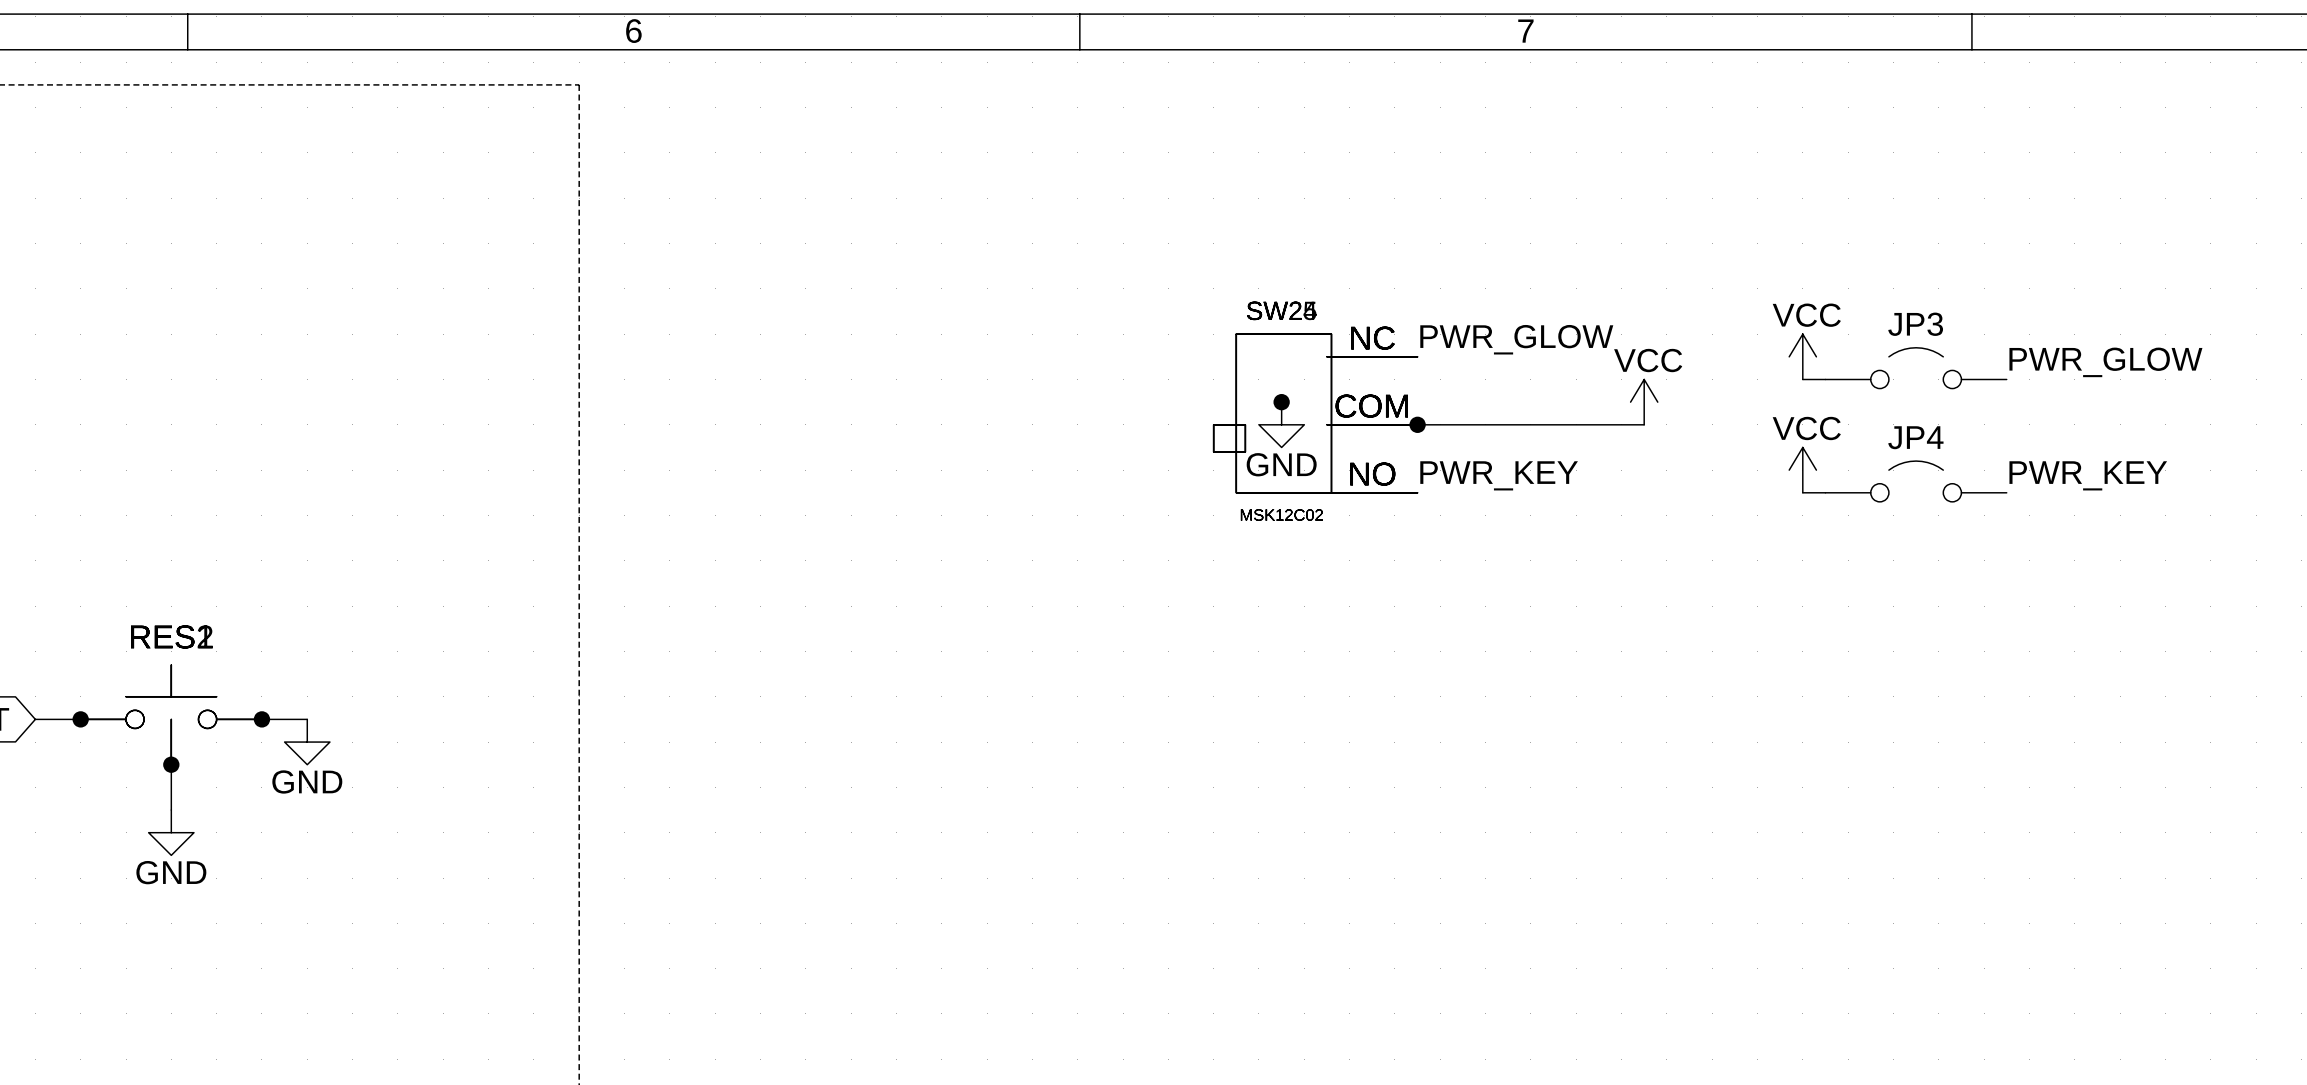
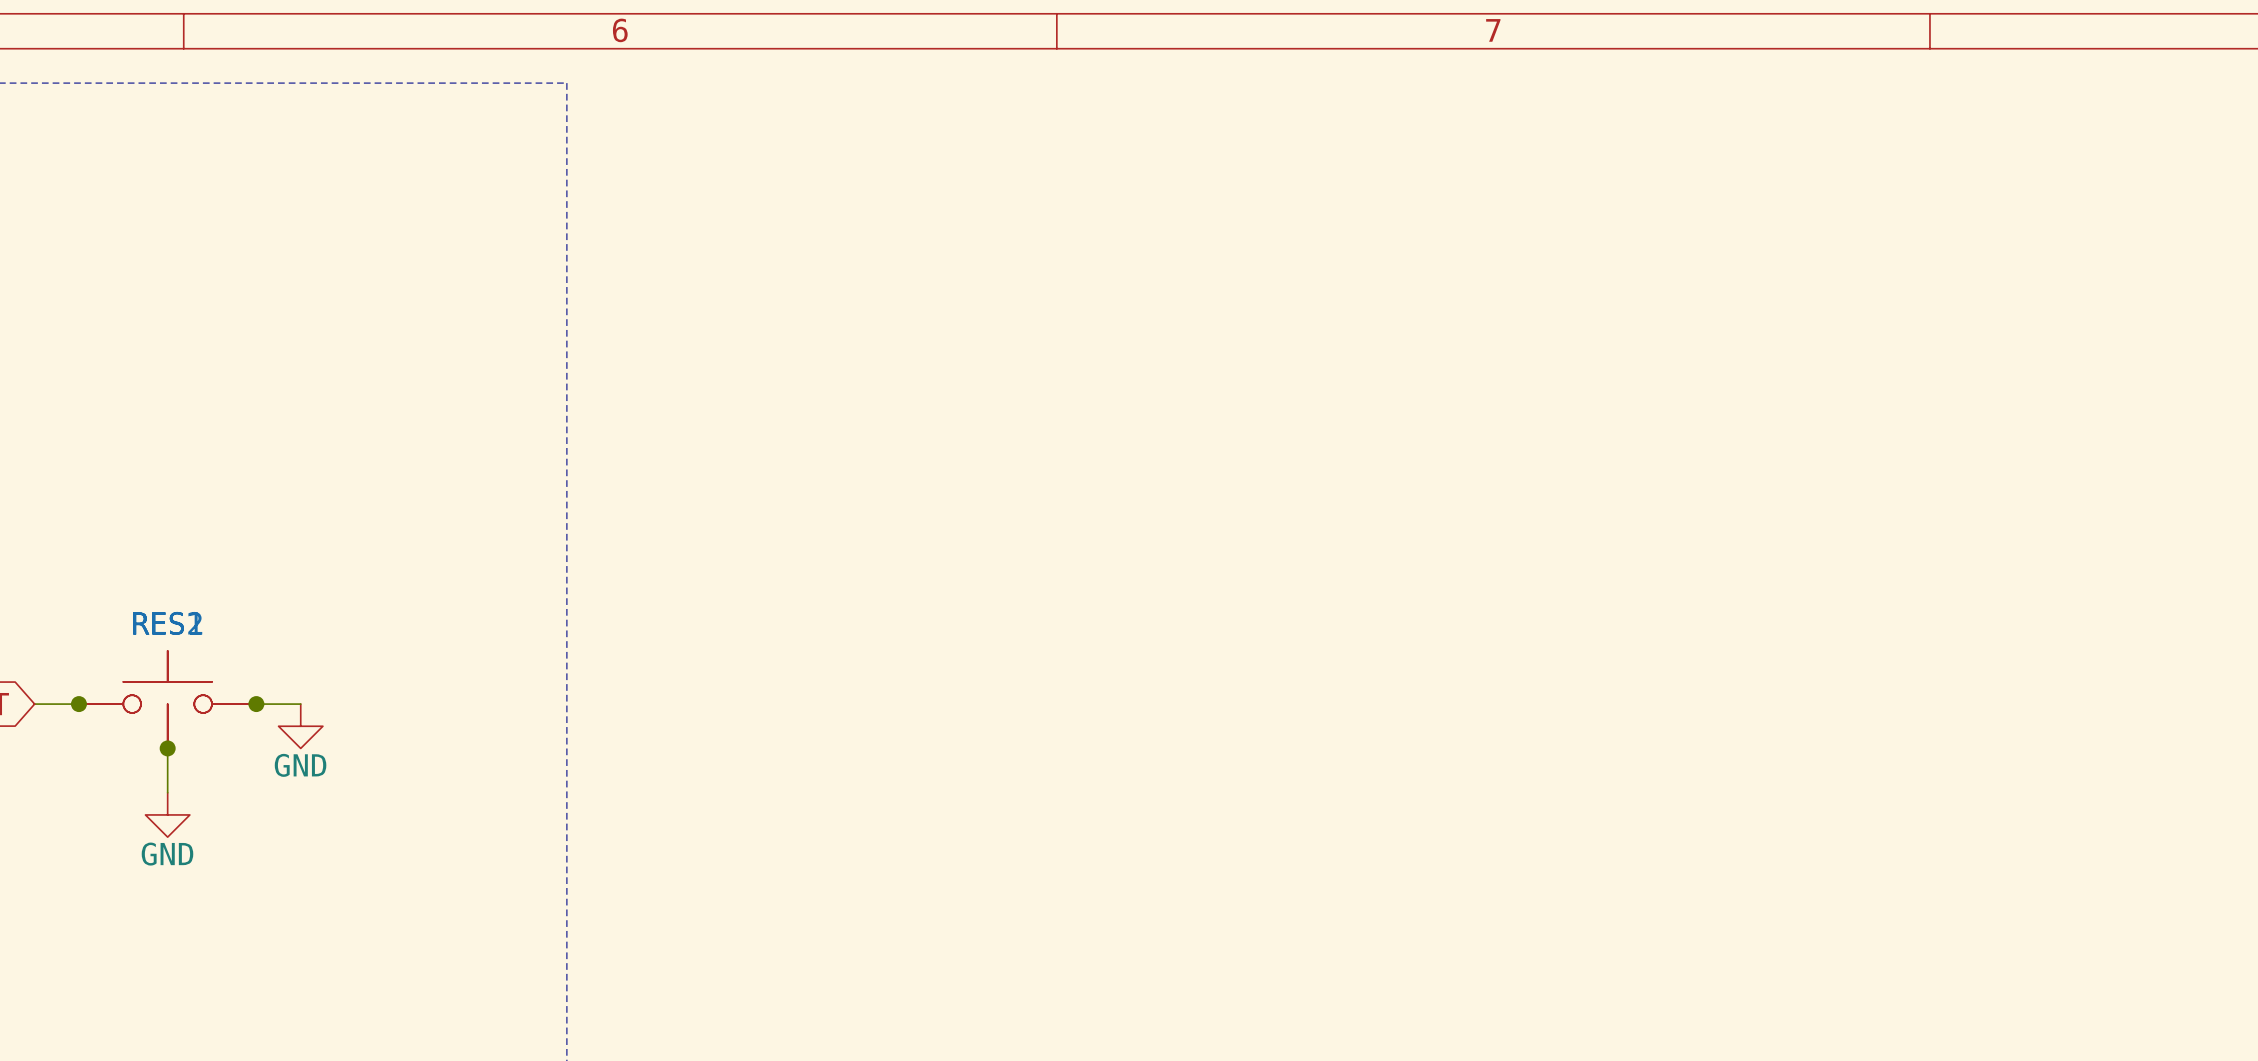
label: PWR_GLOW (1516, 339) -> none
power symbol: VCC (1802, 356) -> none
label: PWR_GLOW (2105, 362) -> none
JP3: (1916, 368) -> none
wire: (1802, 379) (1825, 379) -> none
junction: (1281, 402) -> none
power symbol: VCC (1644, 402) -> none
part: MSK12C02 (1315, 413) -> none
part: MSK12C02 (1315, 413) -> none
power symbol: GND (1281, 424) -> none
wire: (1417, 424) (1644, 424) -> none
junction: (1417, 424) -> none
power symbol: VCC (1802, 470) -> none
label: PWR_KEY (1499, 475) -> none
label: PWR_KEY (2088, 475) -> none
JP4: (1916, 481) -> none
wire: (1802, 492) (1825, 492) -> none

